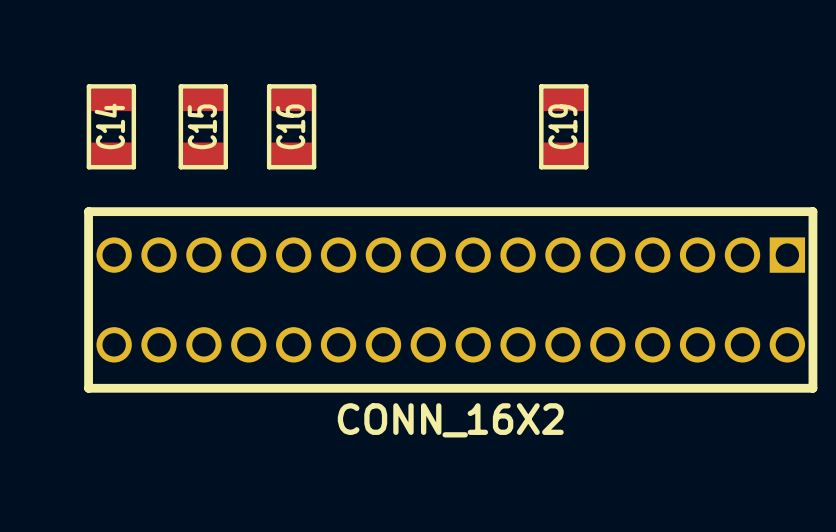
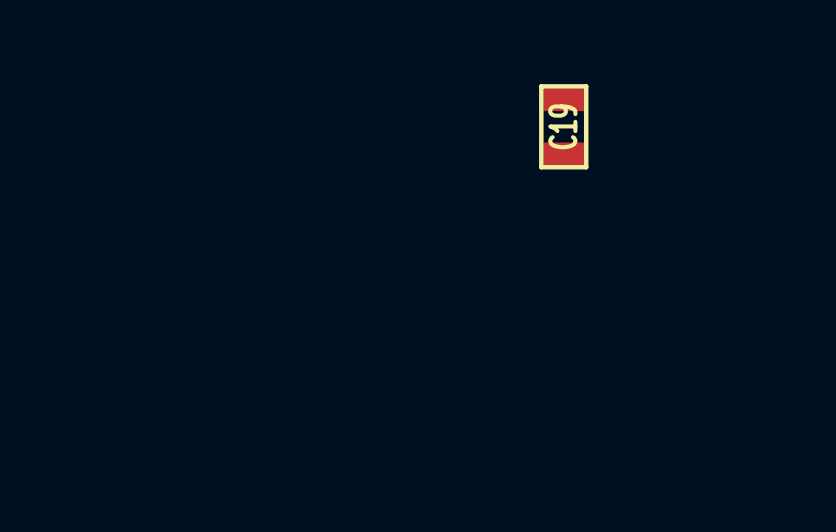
C14: (111, 126) -> none
C15: (203, 126) -> none
C16: (291, 126) -> none
part: CONN_16X2 (450, 299) -> none

